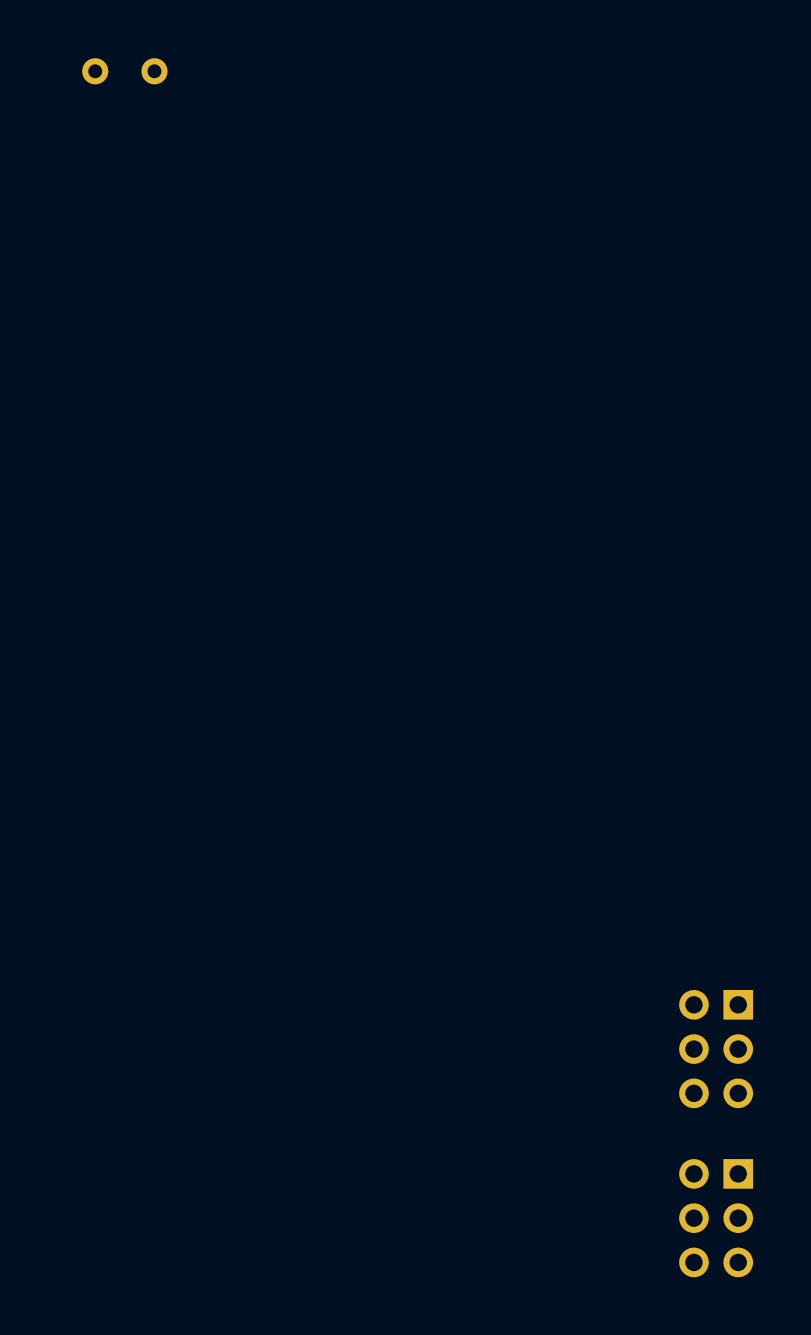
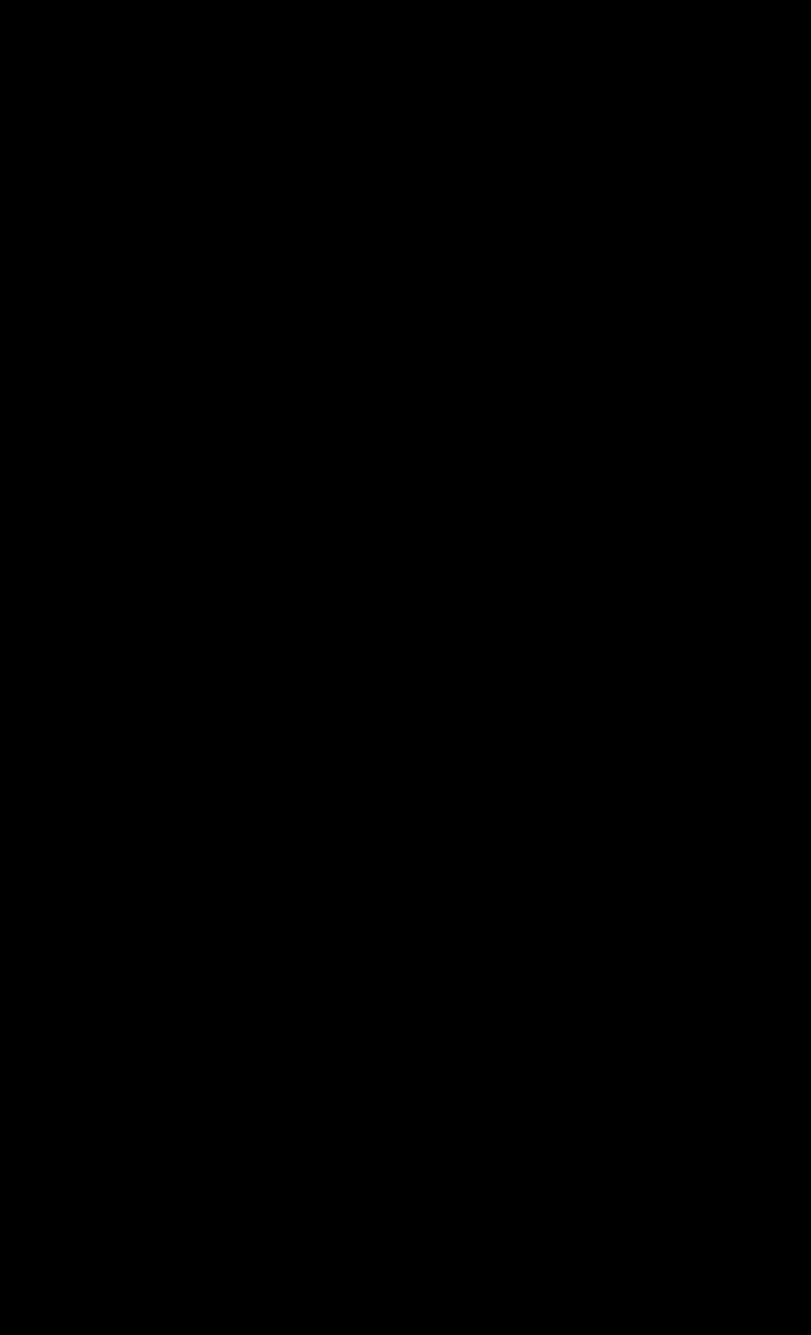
part: (124, 71) -> none
part: (716, 1049) -> none
part: (716, 1218) -> none

